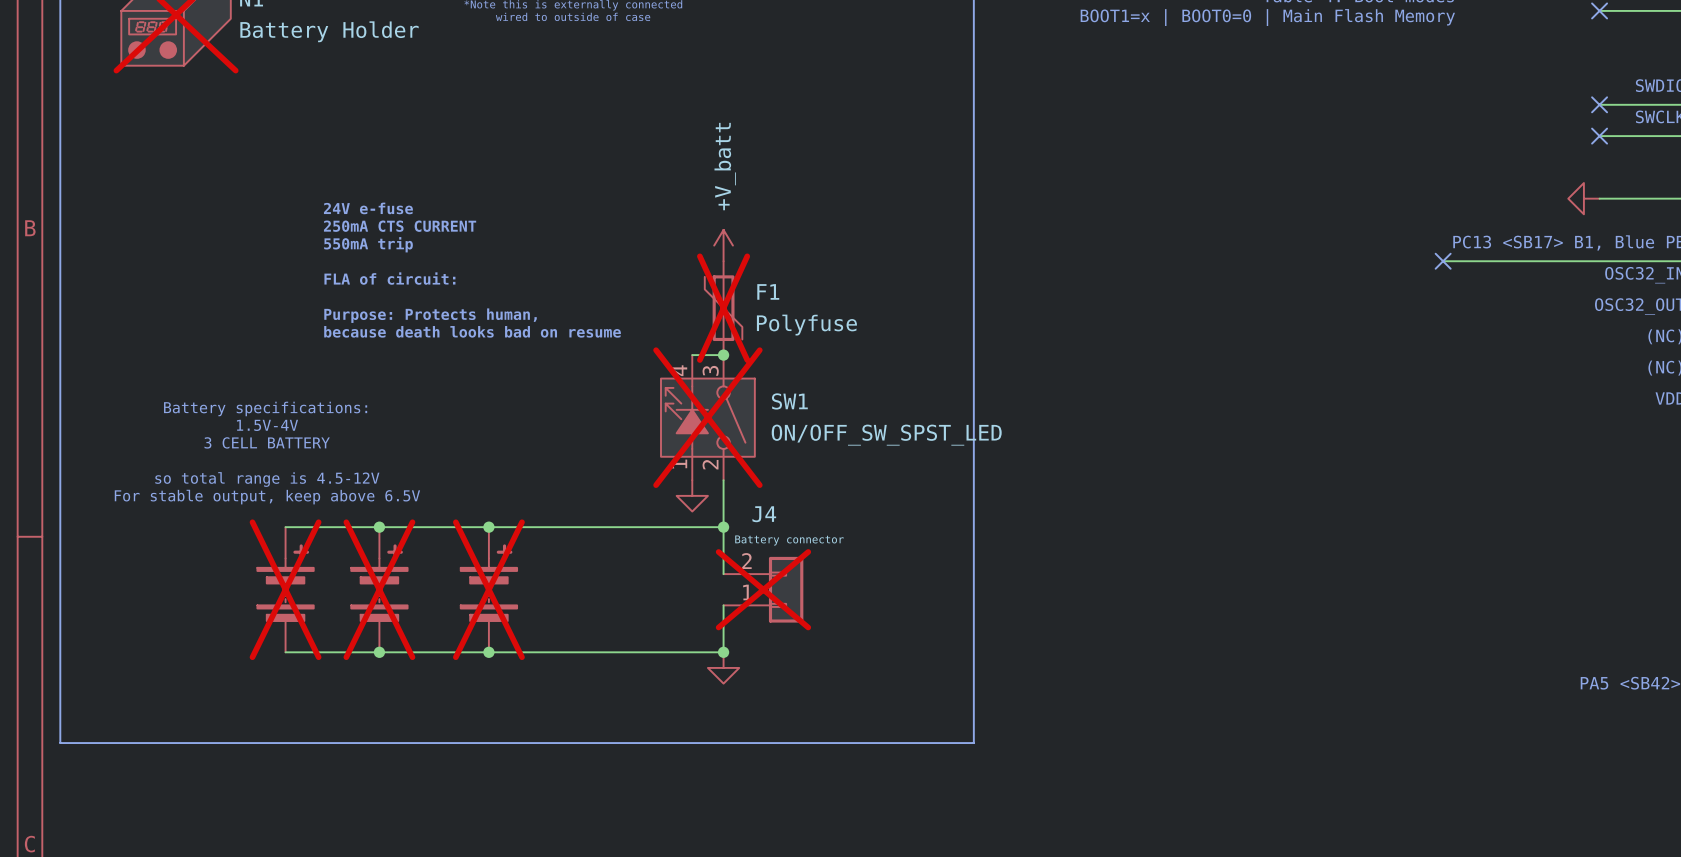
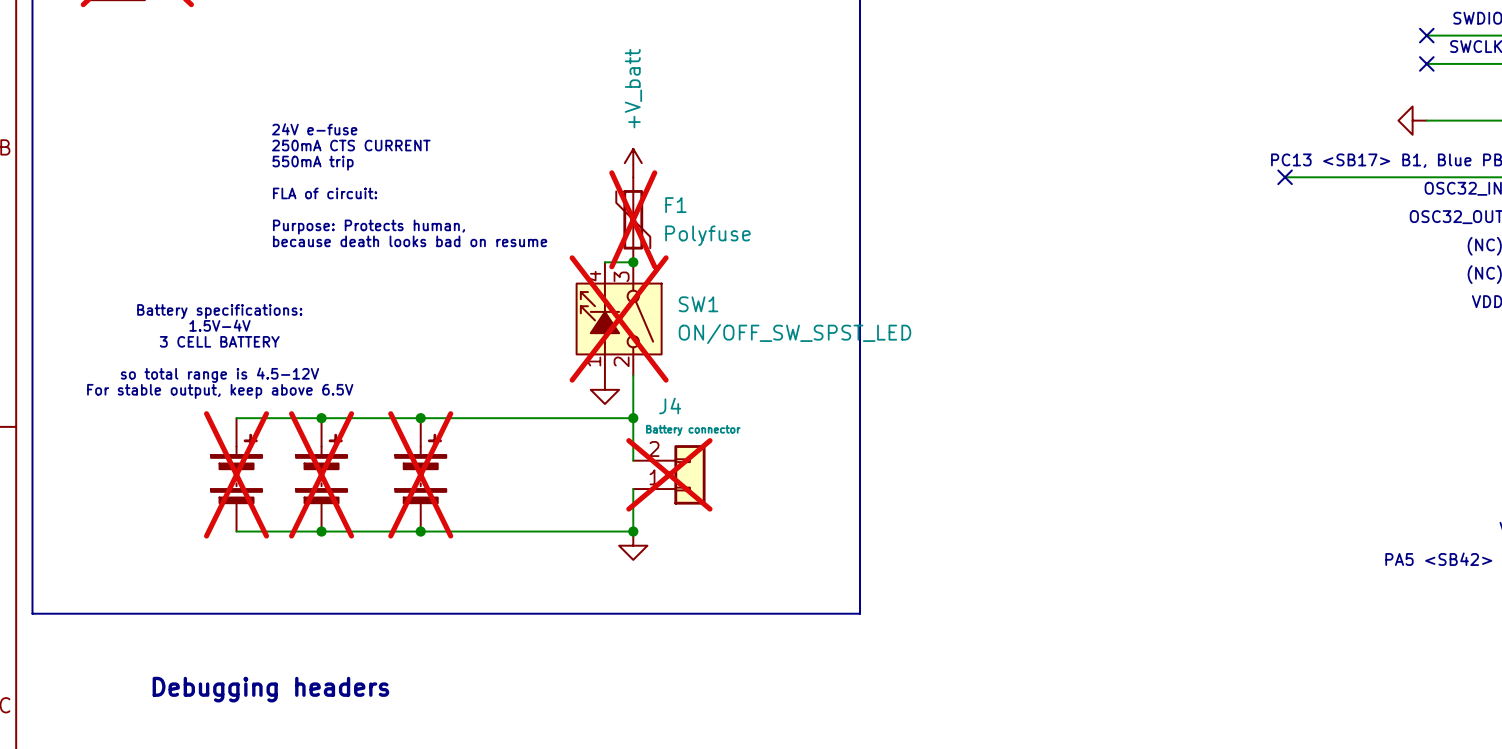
text: none -> Debugging headers (270, 689)

